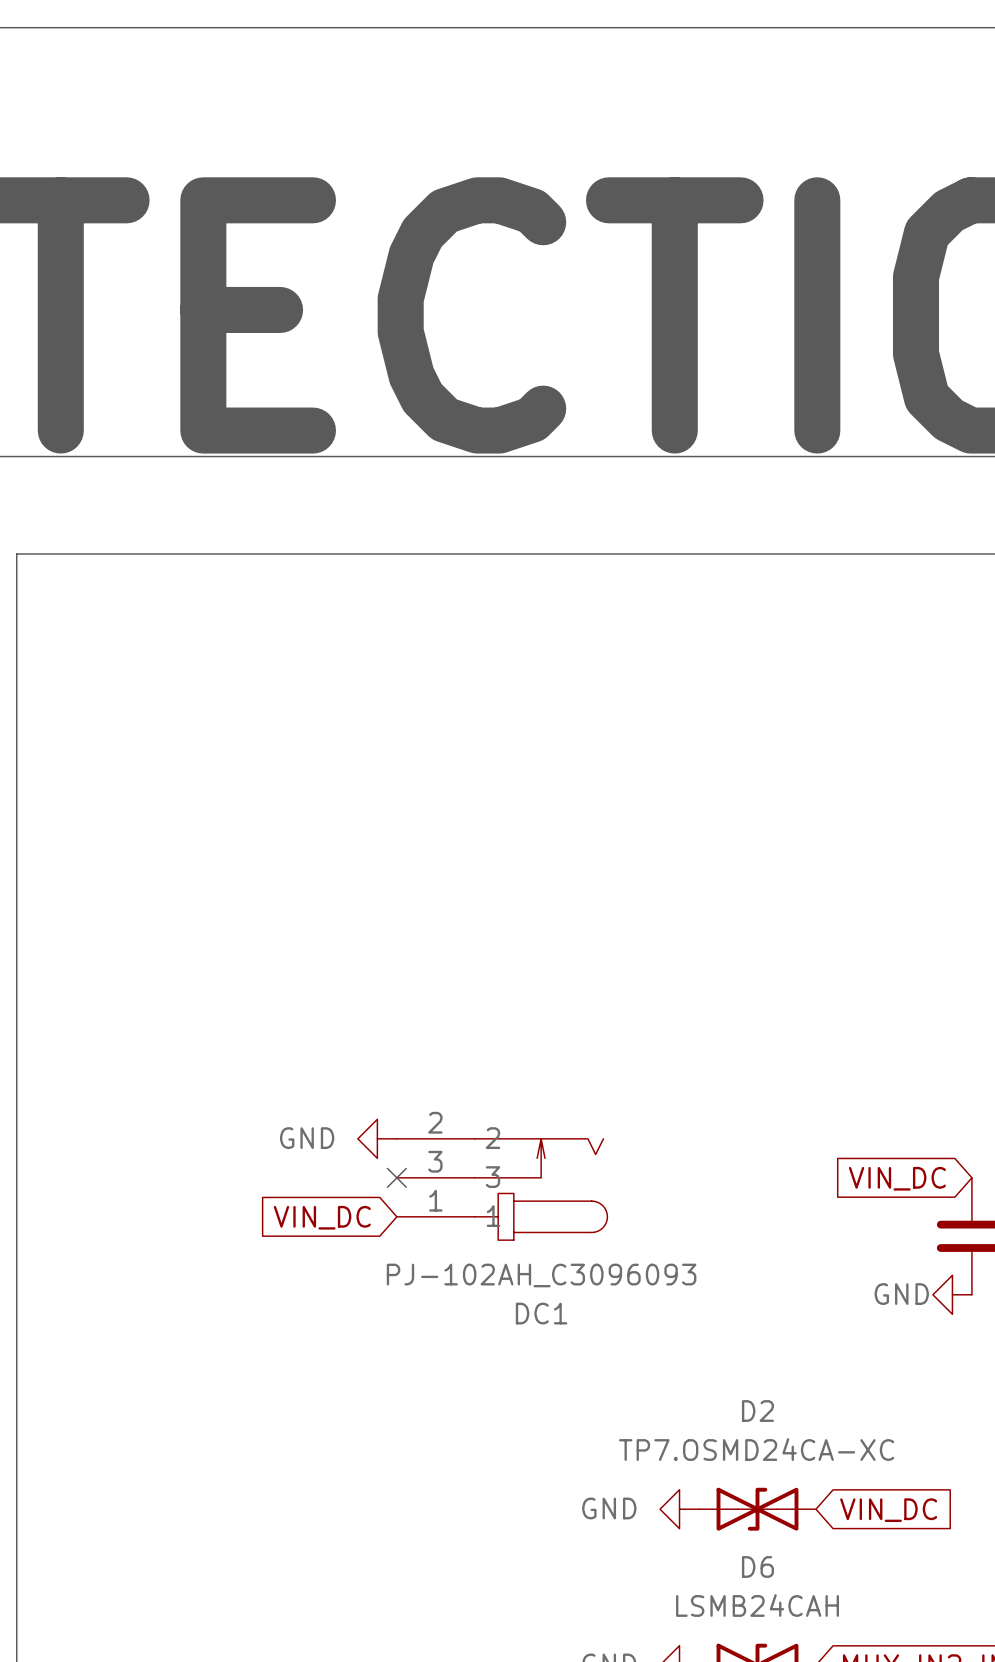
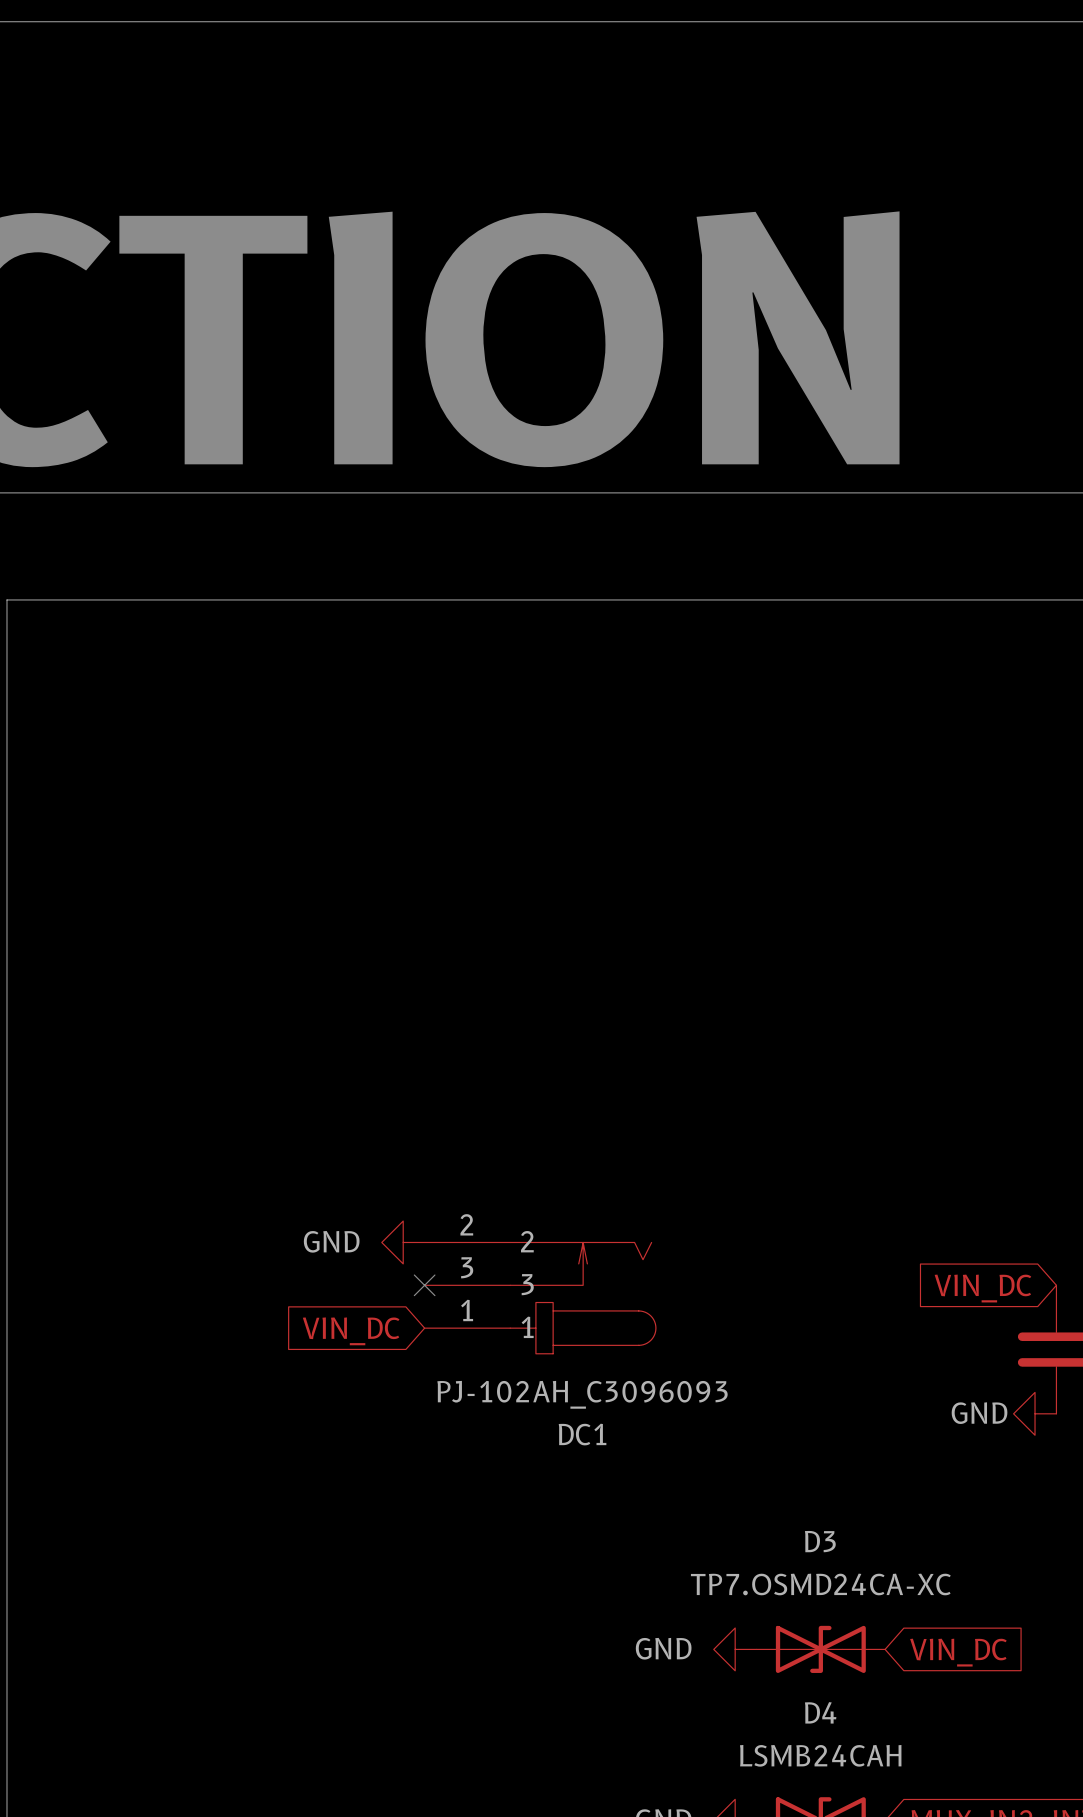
D2 name: D2 (757, 1411) -> D3 (820, 1541)
D6 name: D6 (757, 1566) -> D4 (820, 1712)

